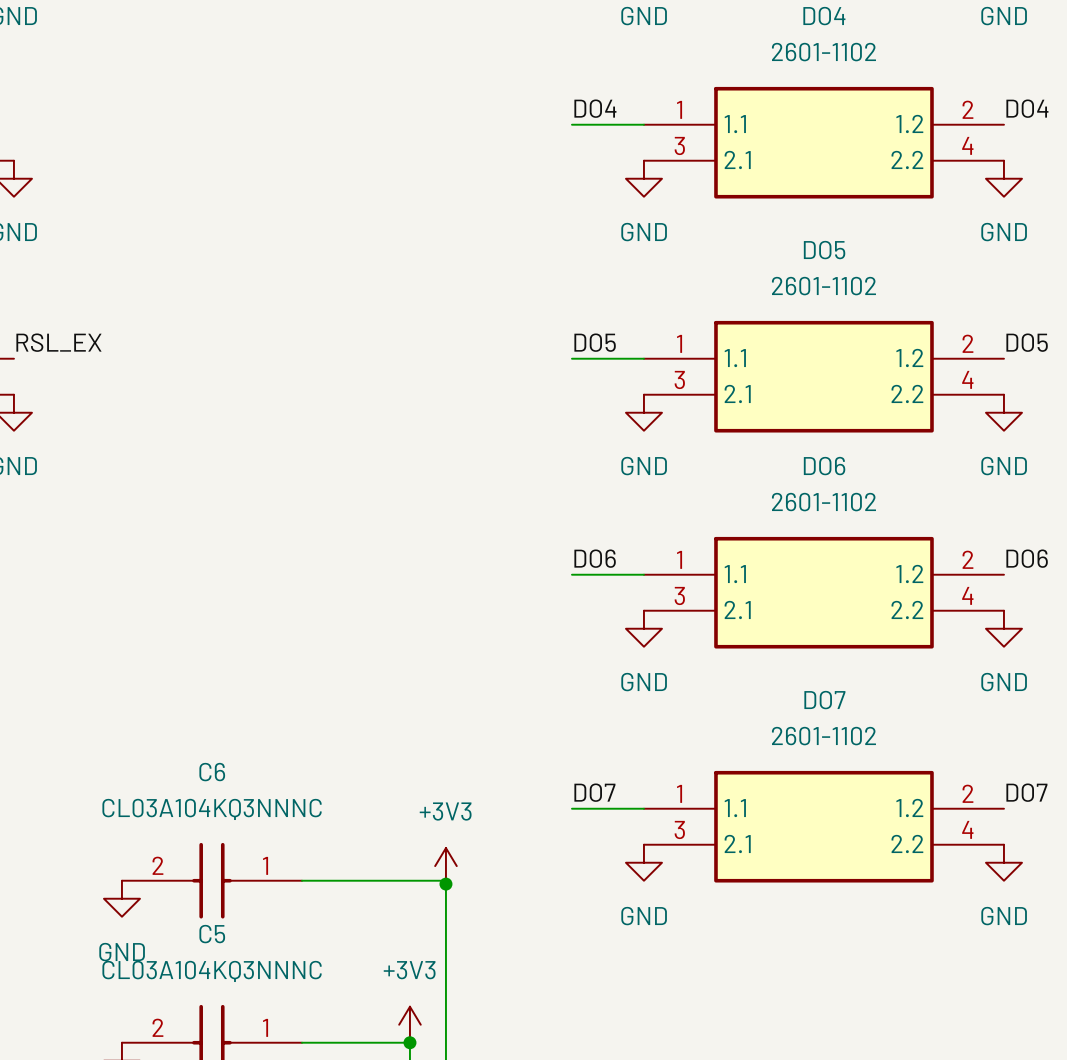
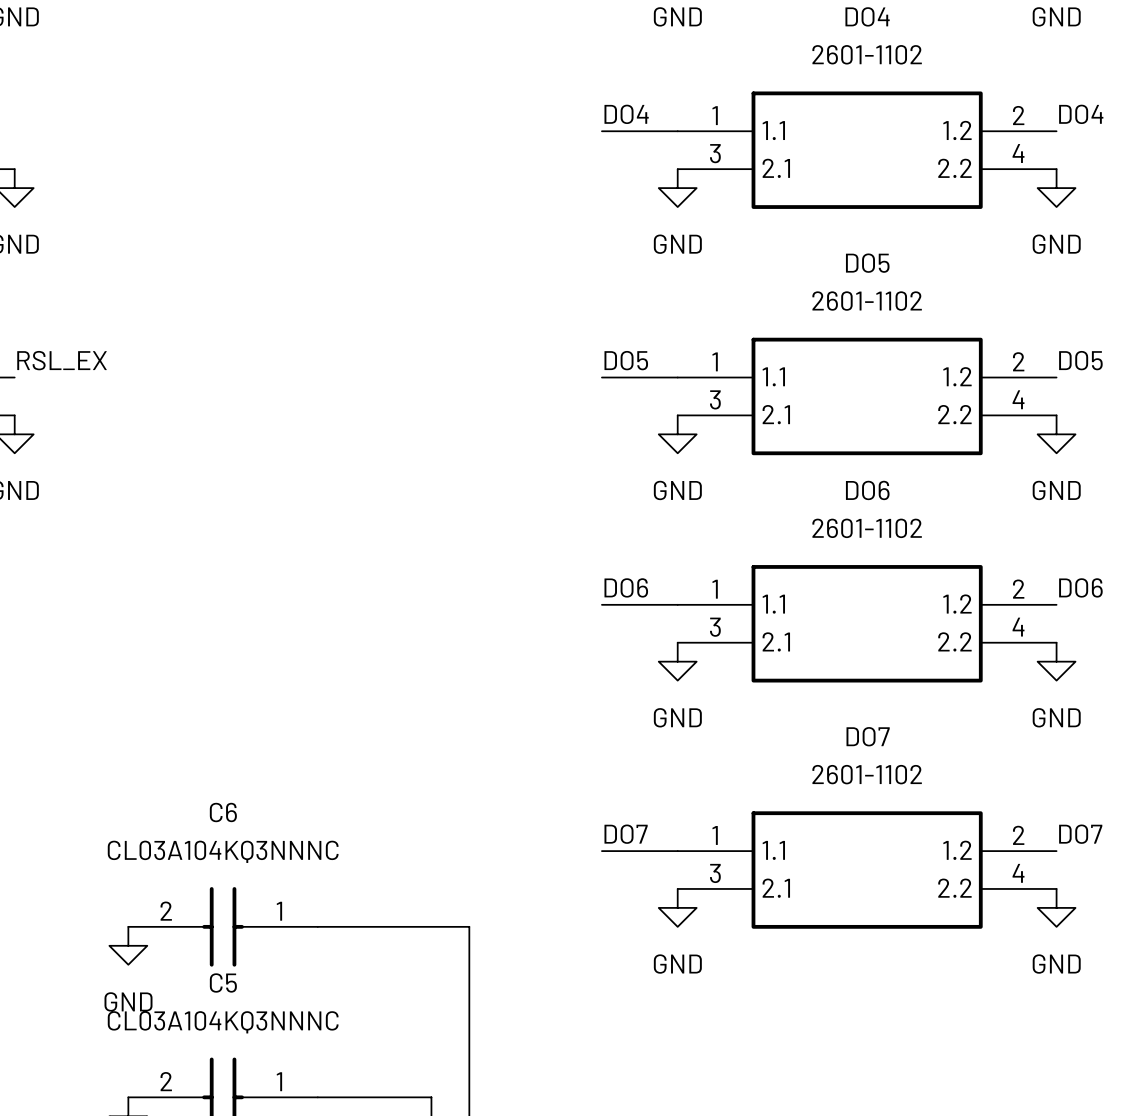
power symbol: +3V3 (445, 866) -> none
junction: (445, 884) -> none
power symbol: +3V3 (409, 1024) -> none
junction: (409, 1042) -> none

